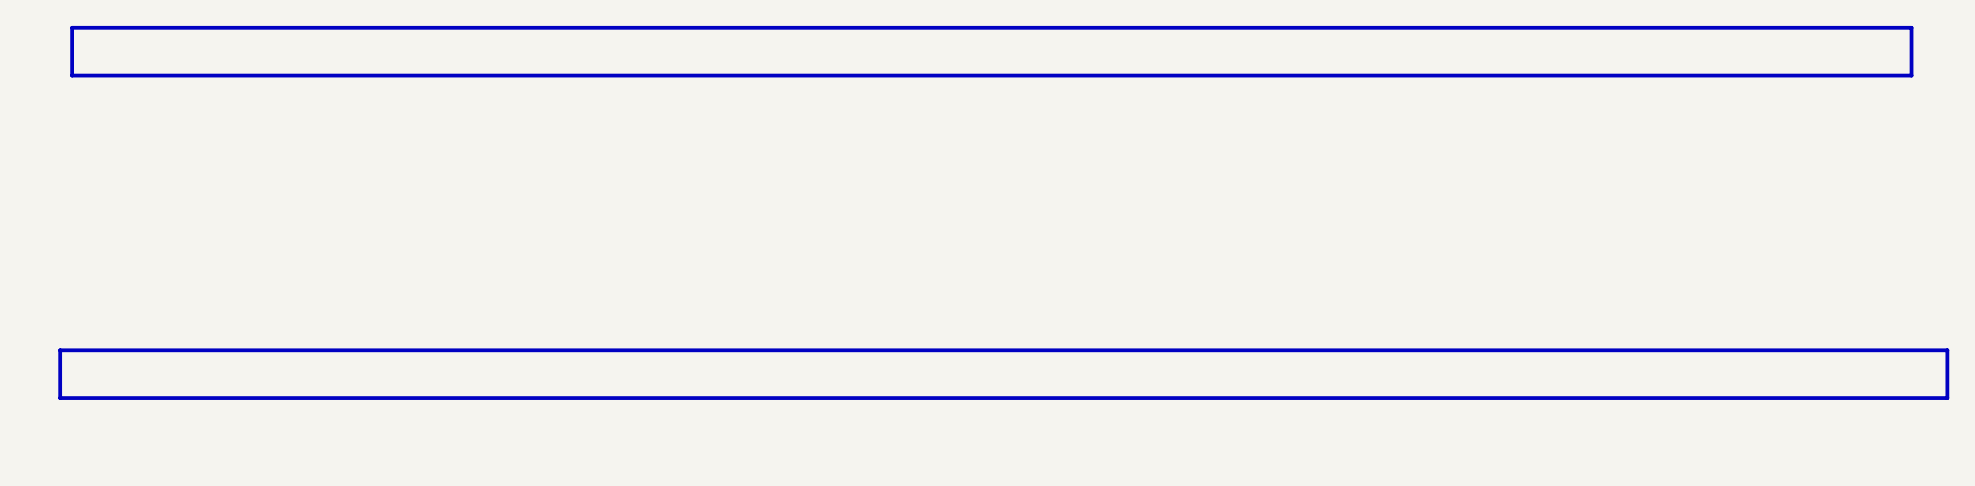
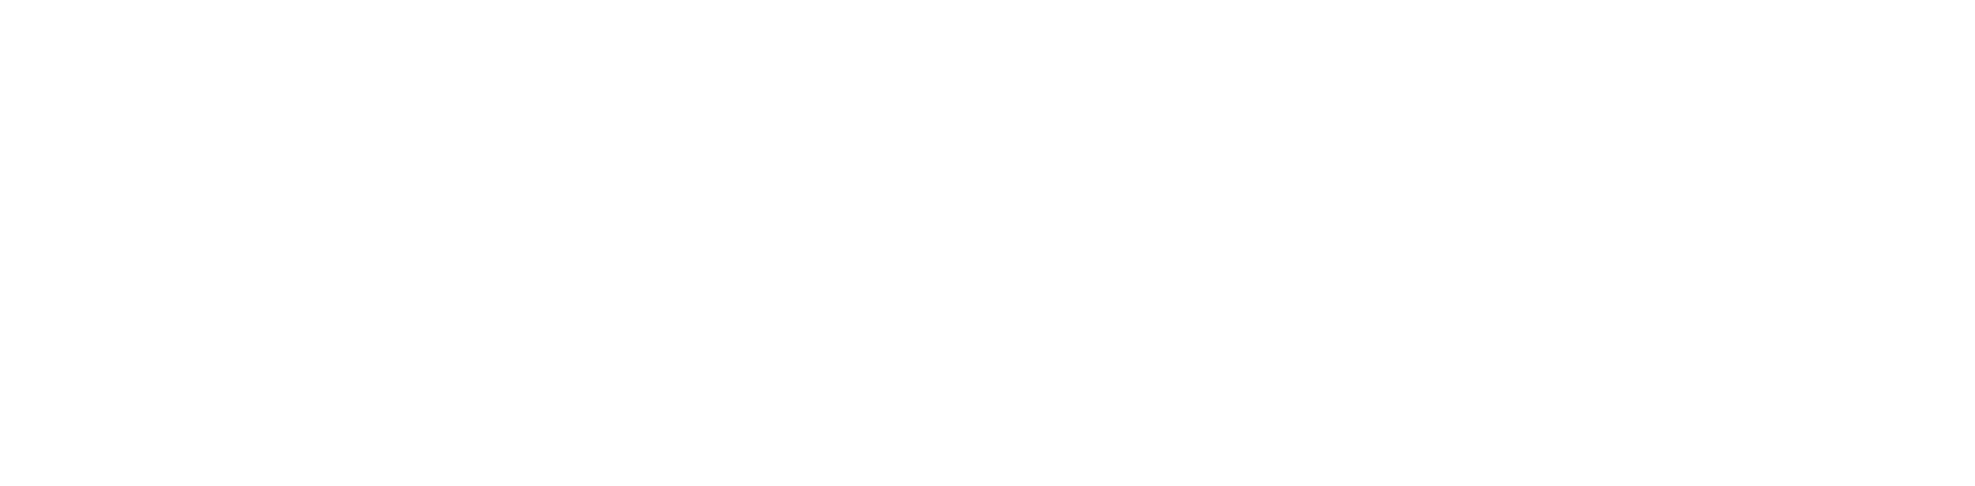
line: (72, 27) (1911, 27) (1911, 75) (72, 75) (72, 27) -> none
line: (60, 350) (1947, 350) (1947, 398) (60, 398) (60, 350) -> none

